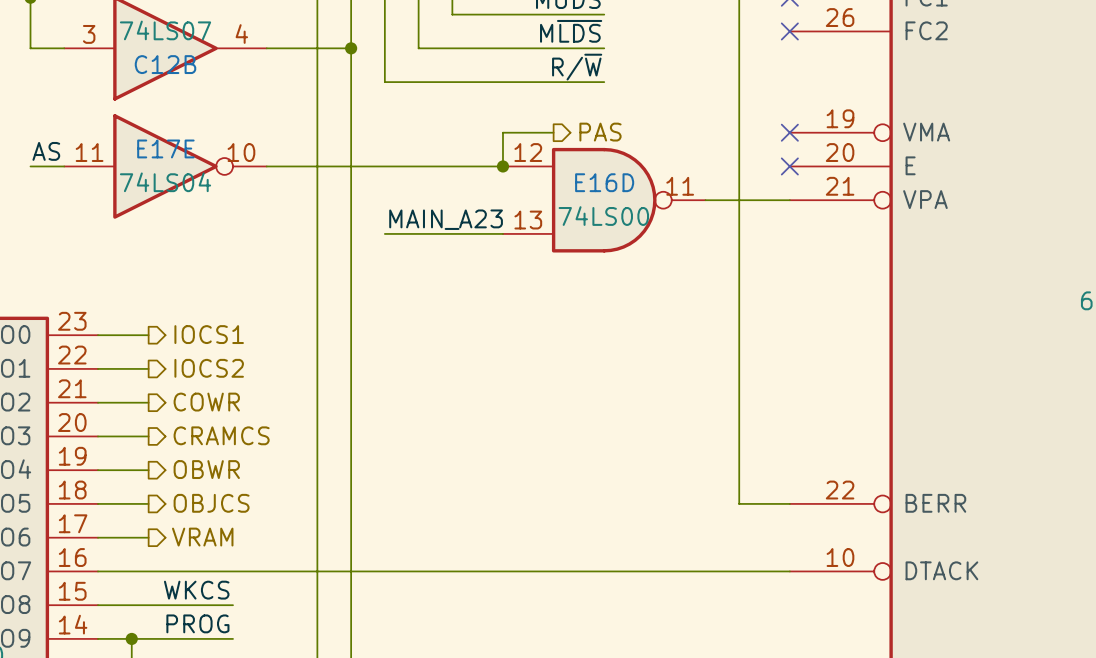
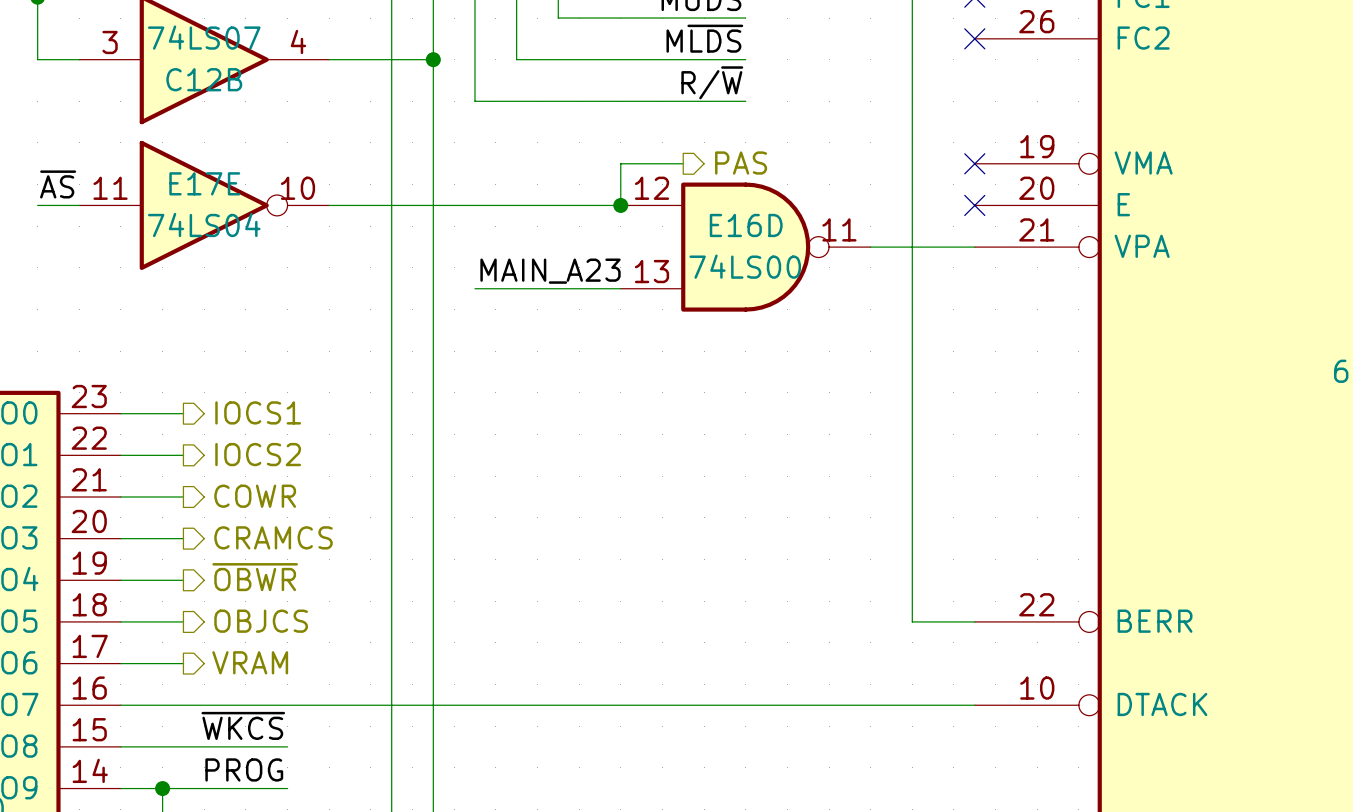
label: AS (46, 151) -> ~{AS} (58, 184)
hierarchical label: OBWR (206, 469) -> ~{OBWR} (255, 577)
label: WKCS (196, 590) -> ~{WKCS} (243, 725)

